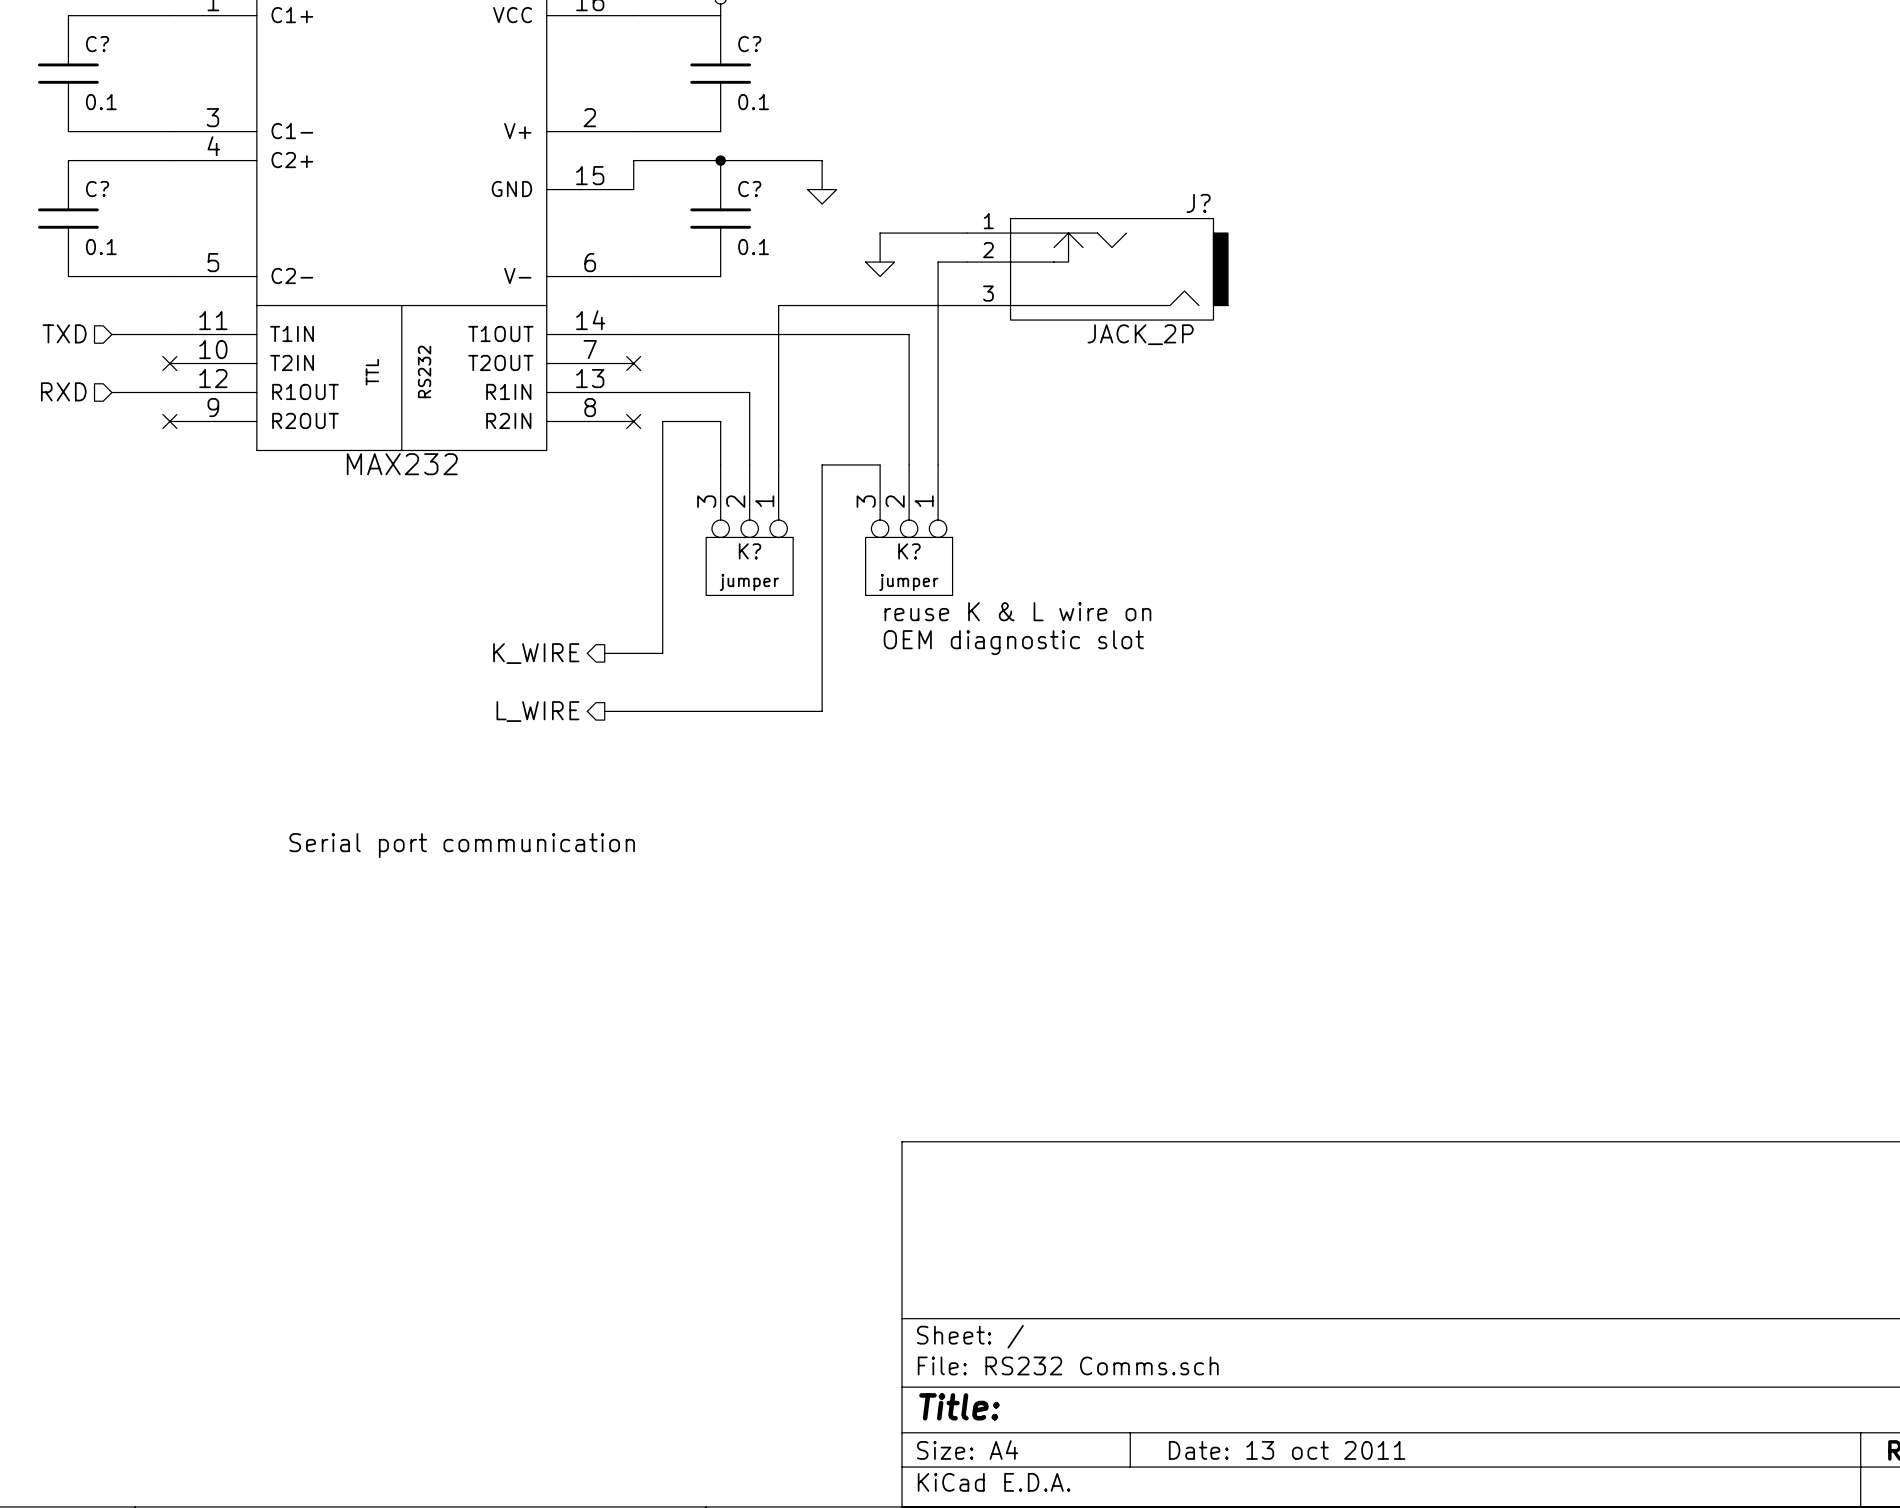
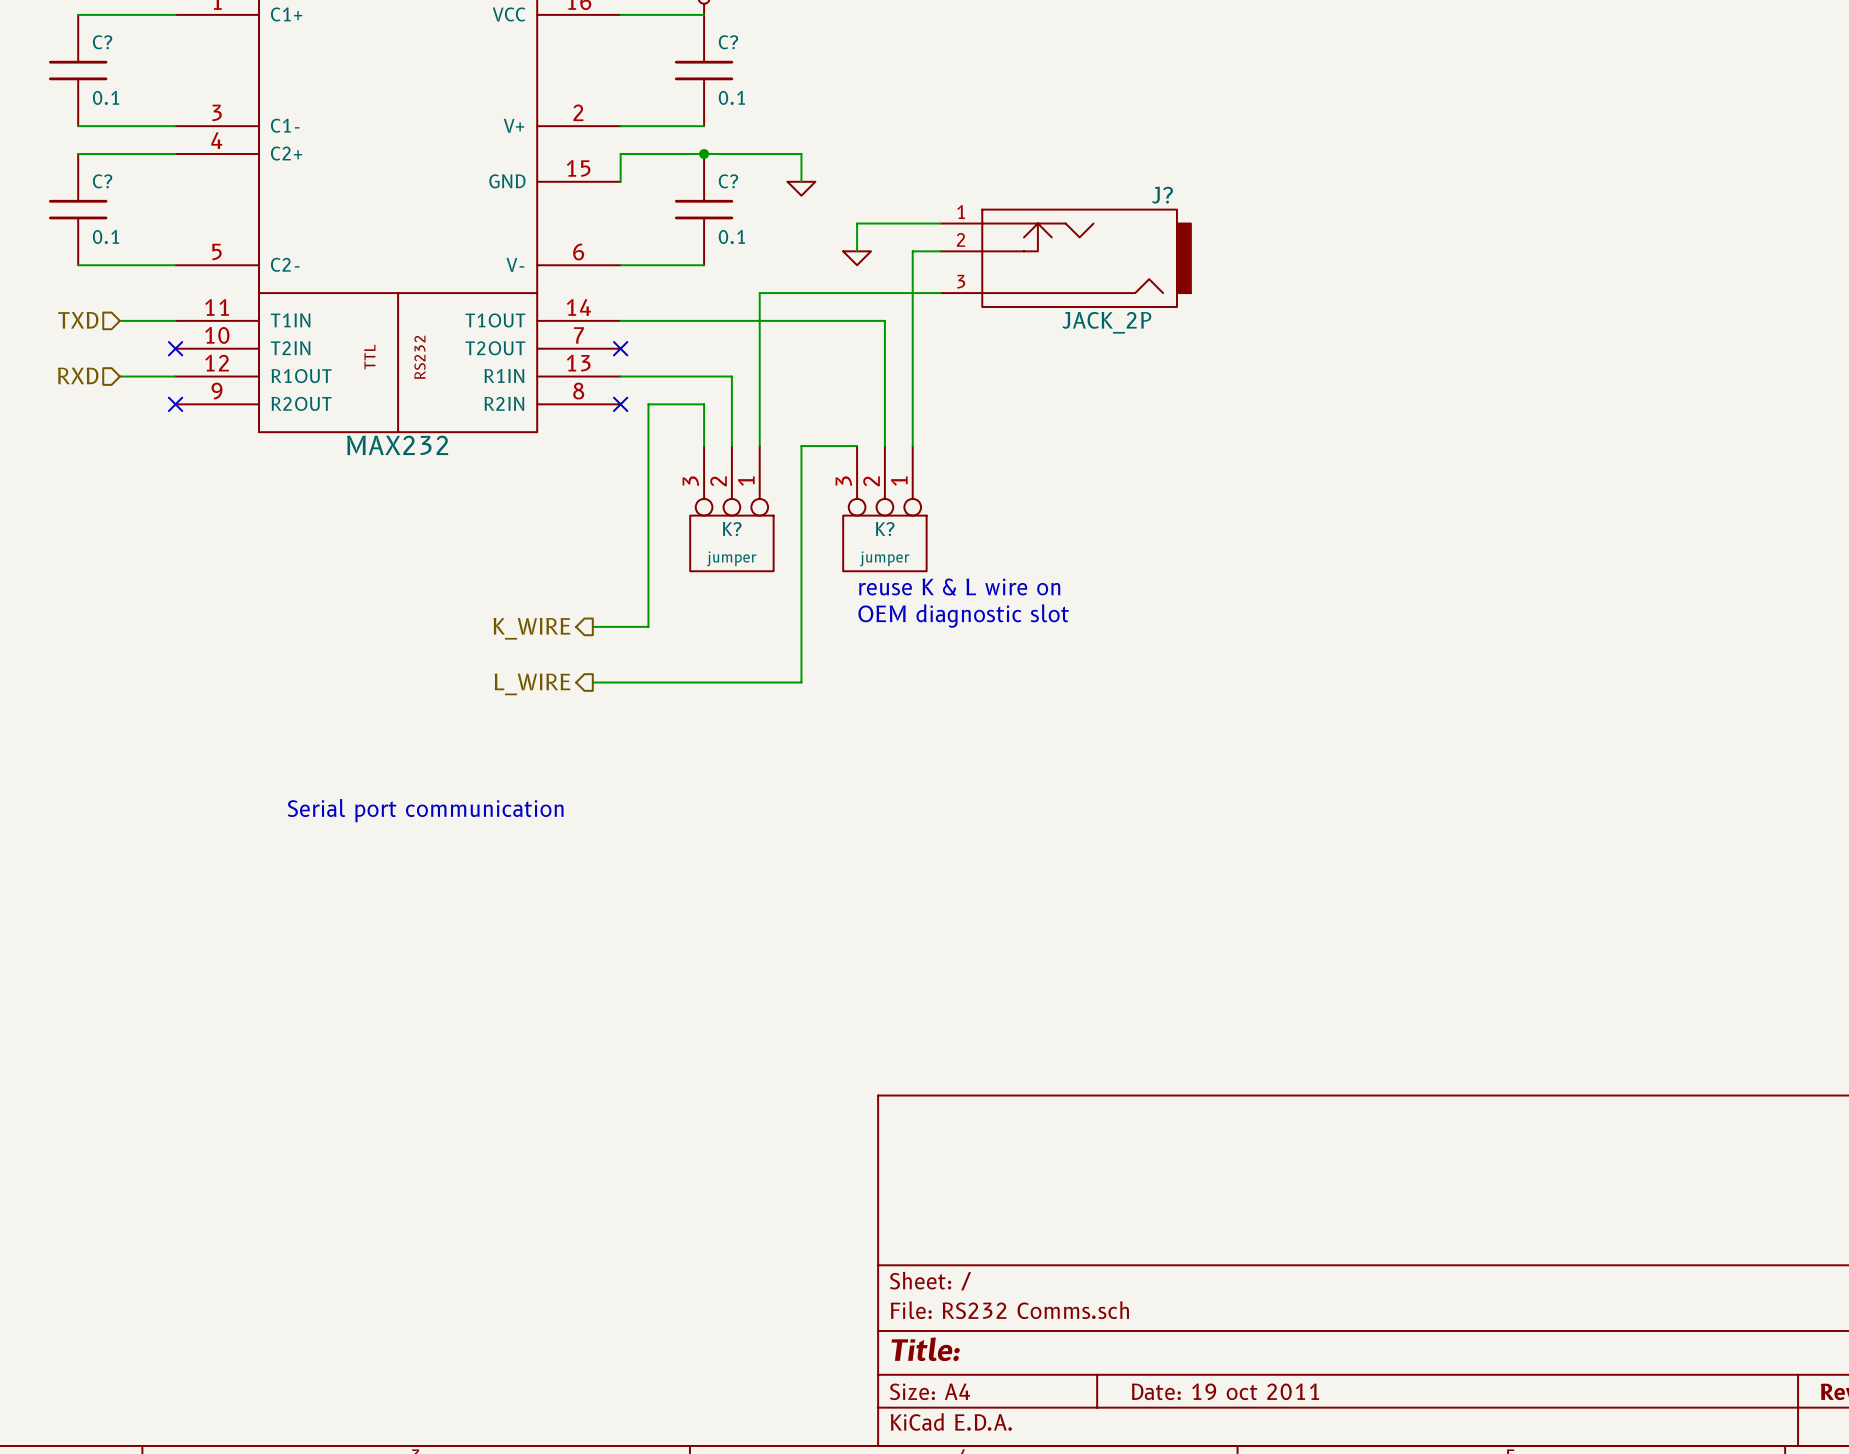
title block: Date: 13 oct 2011 (1287, 1450) -> Date: 19 oct 2011 (1225, 1391)

